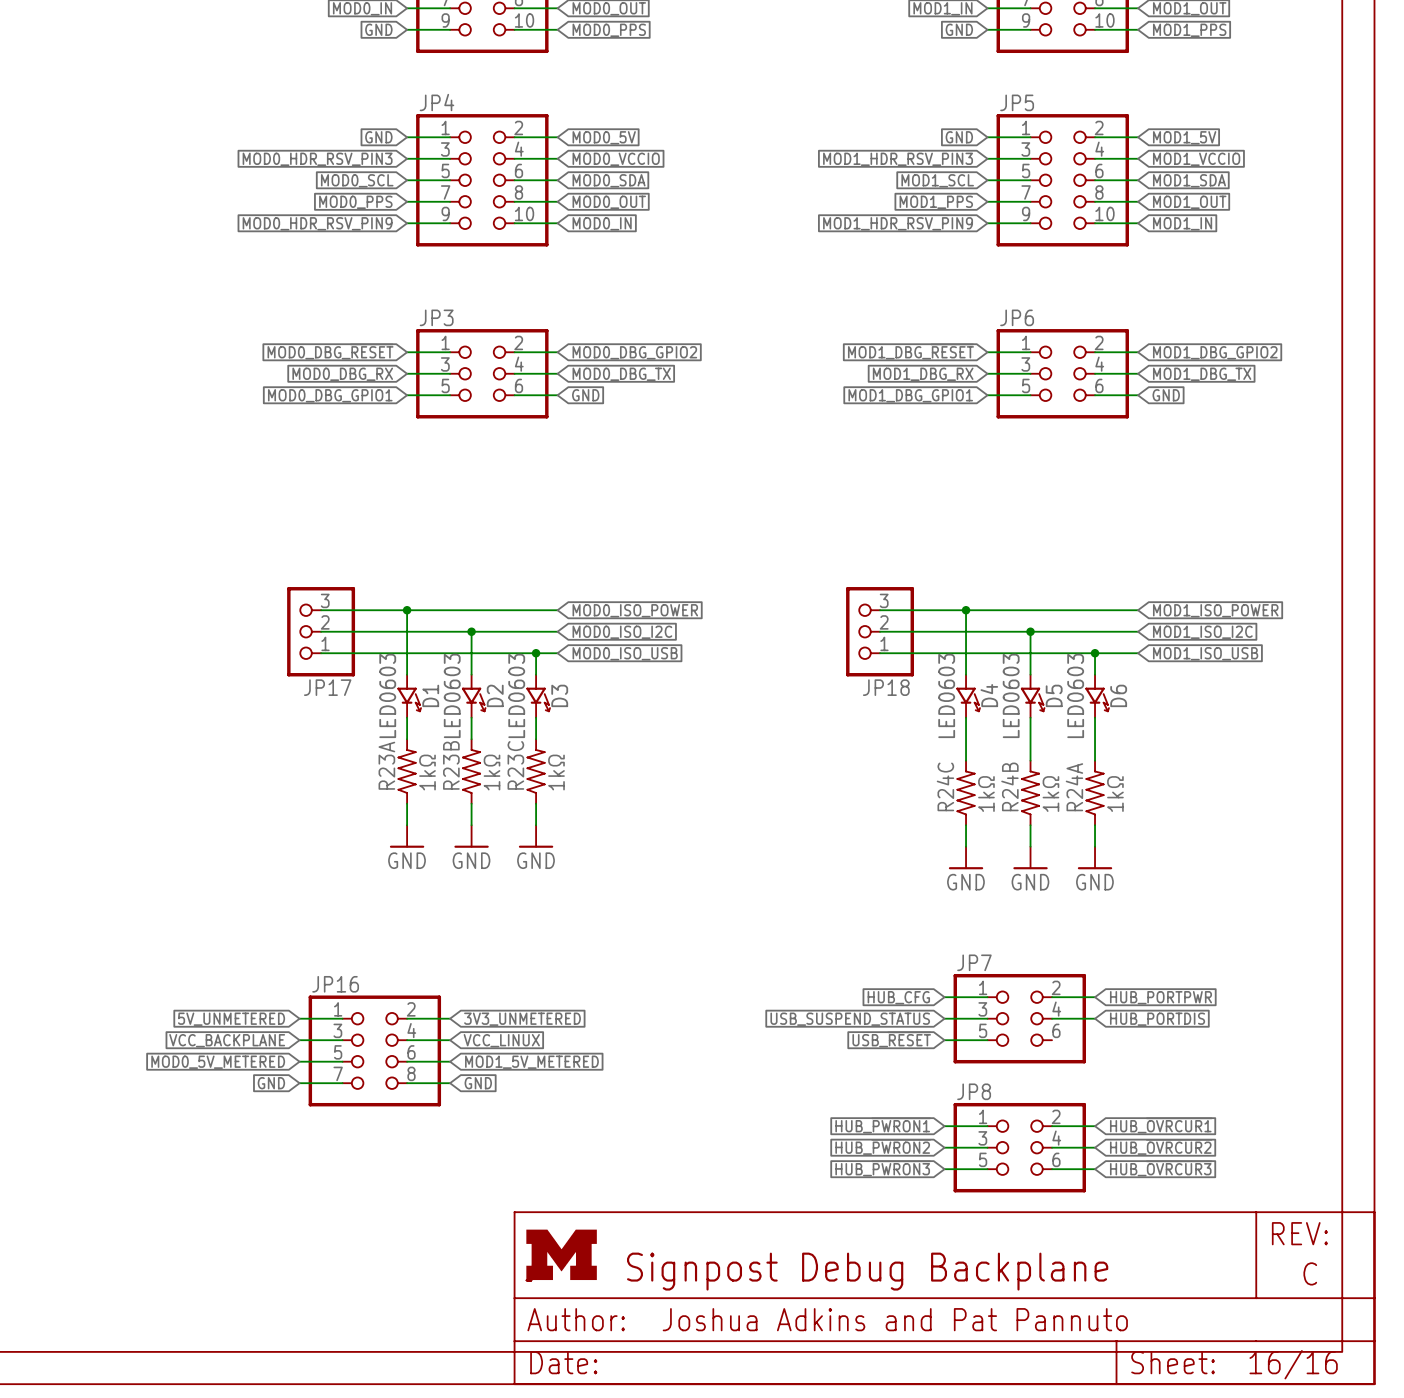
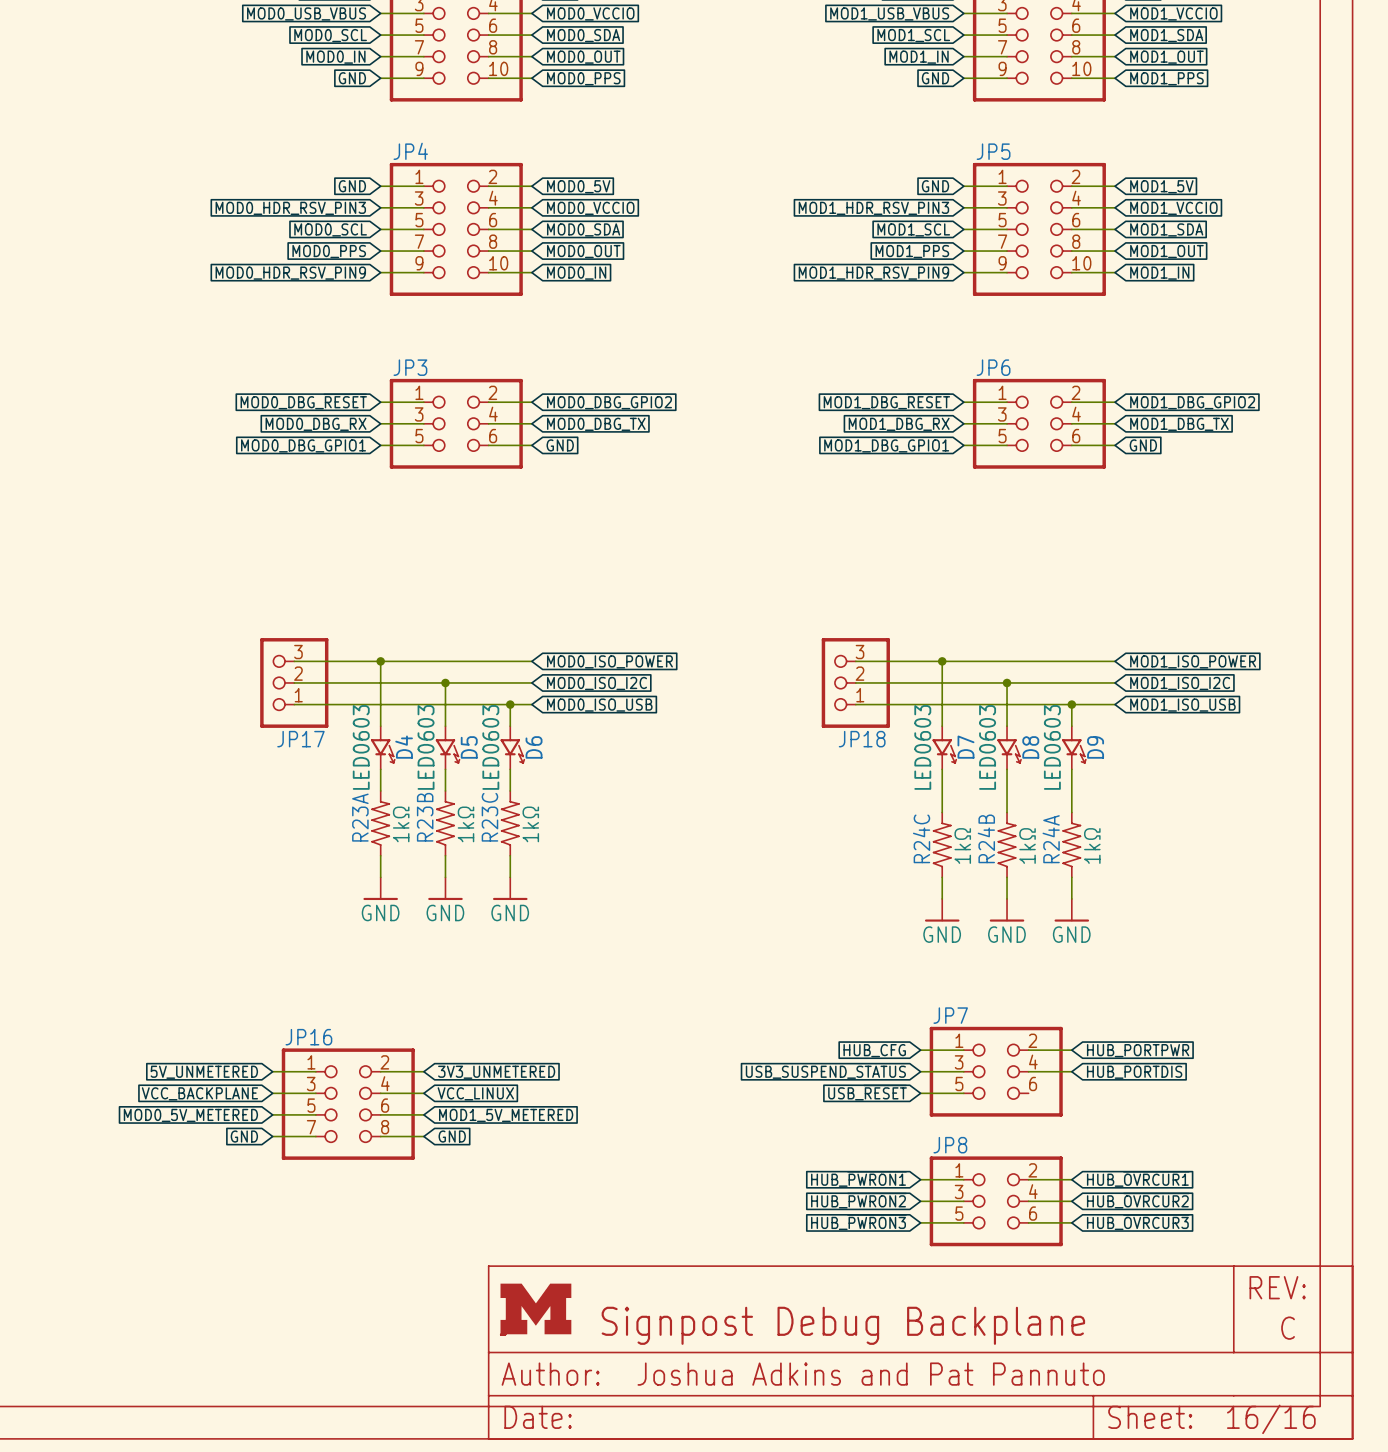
D1 name: D1 (430, 695) -> D4 (404, 747)
D2 name: D2 (495, 695) -> D5 (469, 747)
D3 name: D3 (559, 695) -> D6 (534, 747)
D4 name: D4 (989, 695) -> D7 (965, 747)
D5 name: D5 (1054, 695) -> D8 (1030, 747)
D6 name: D6 (1118, 695) -> D9 (1095, 747)

